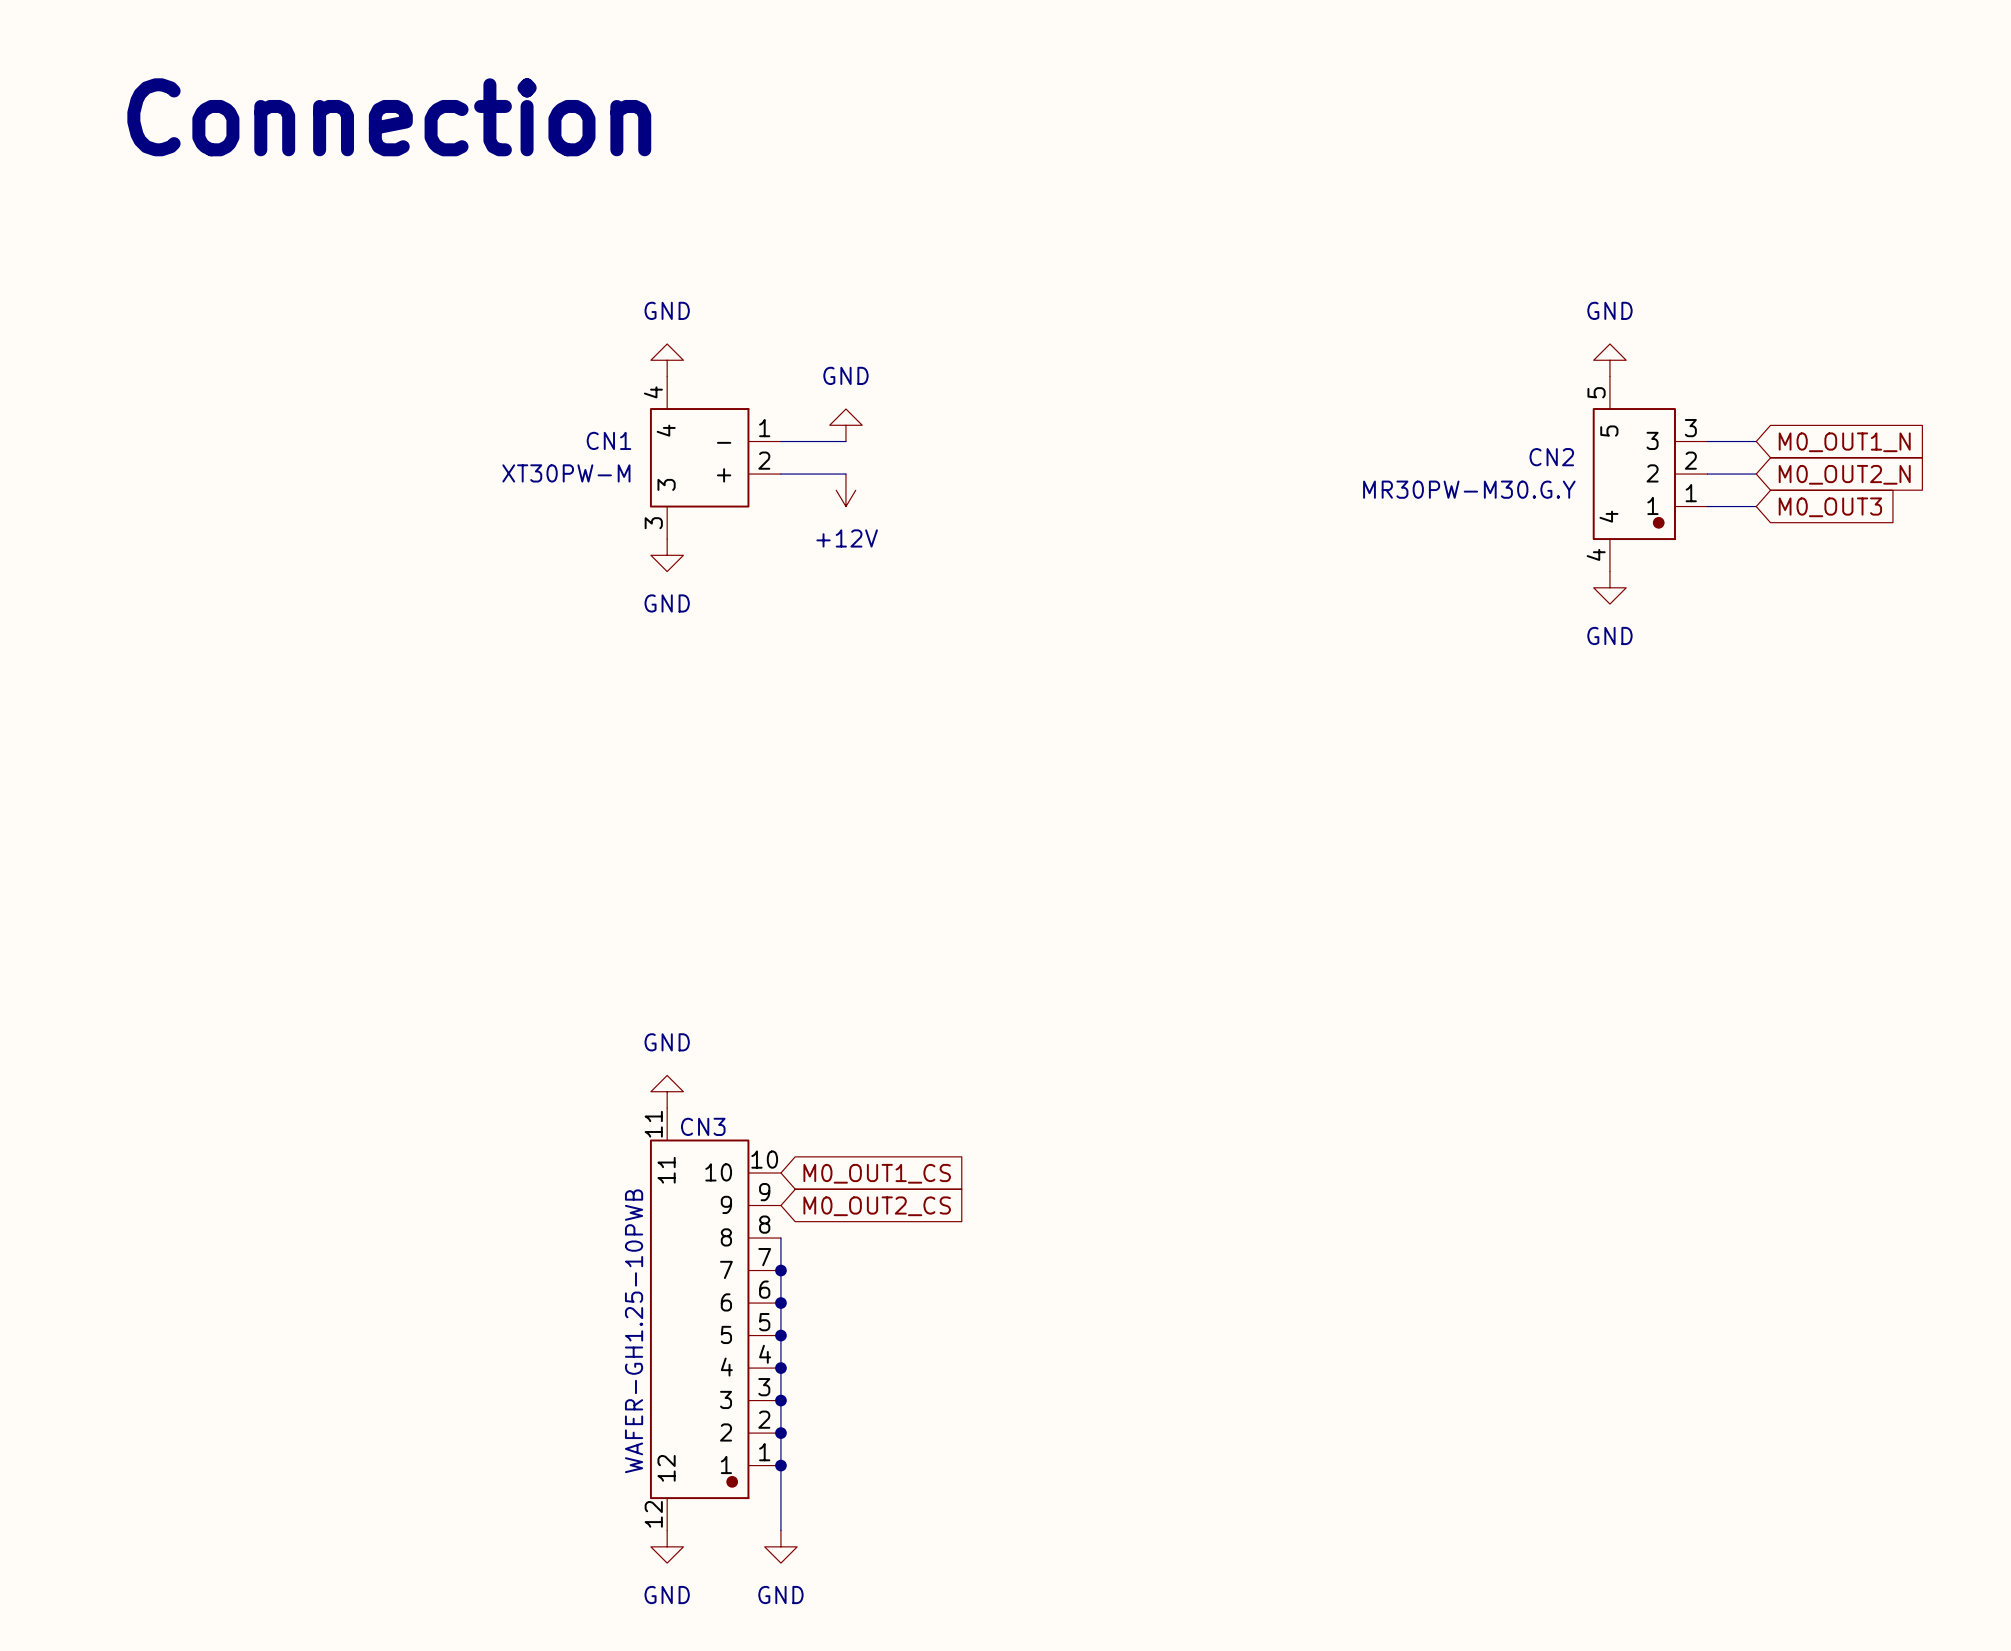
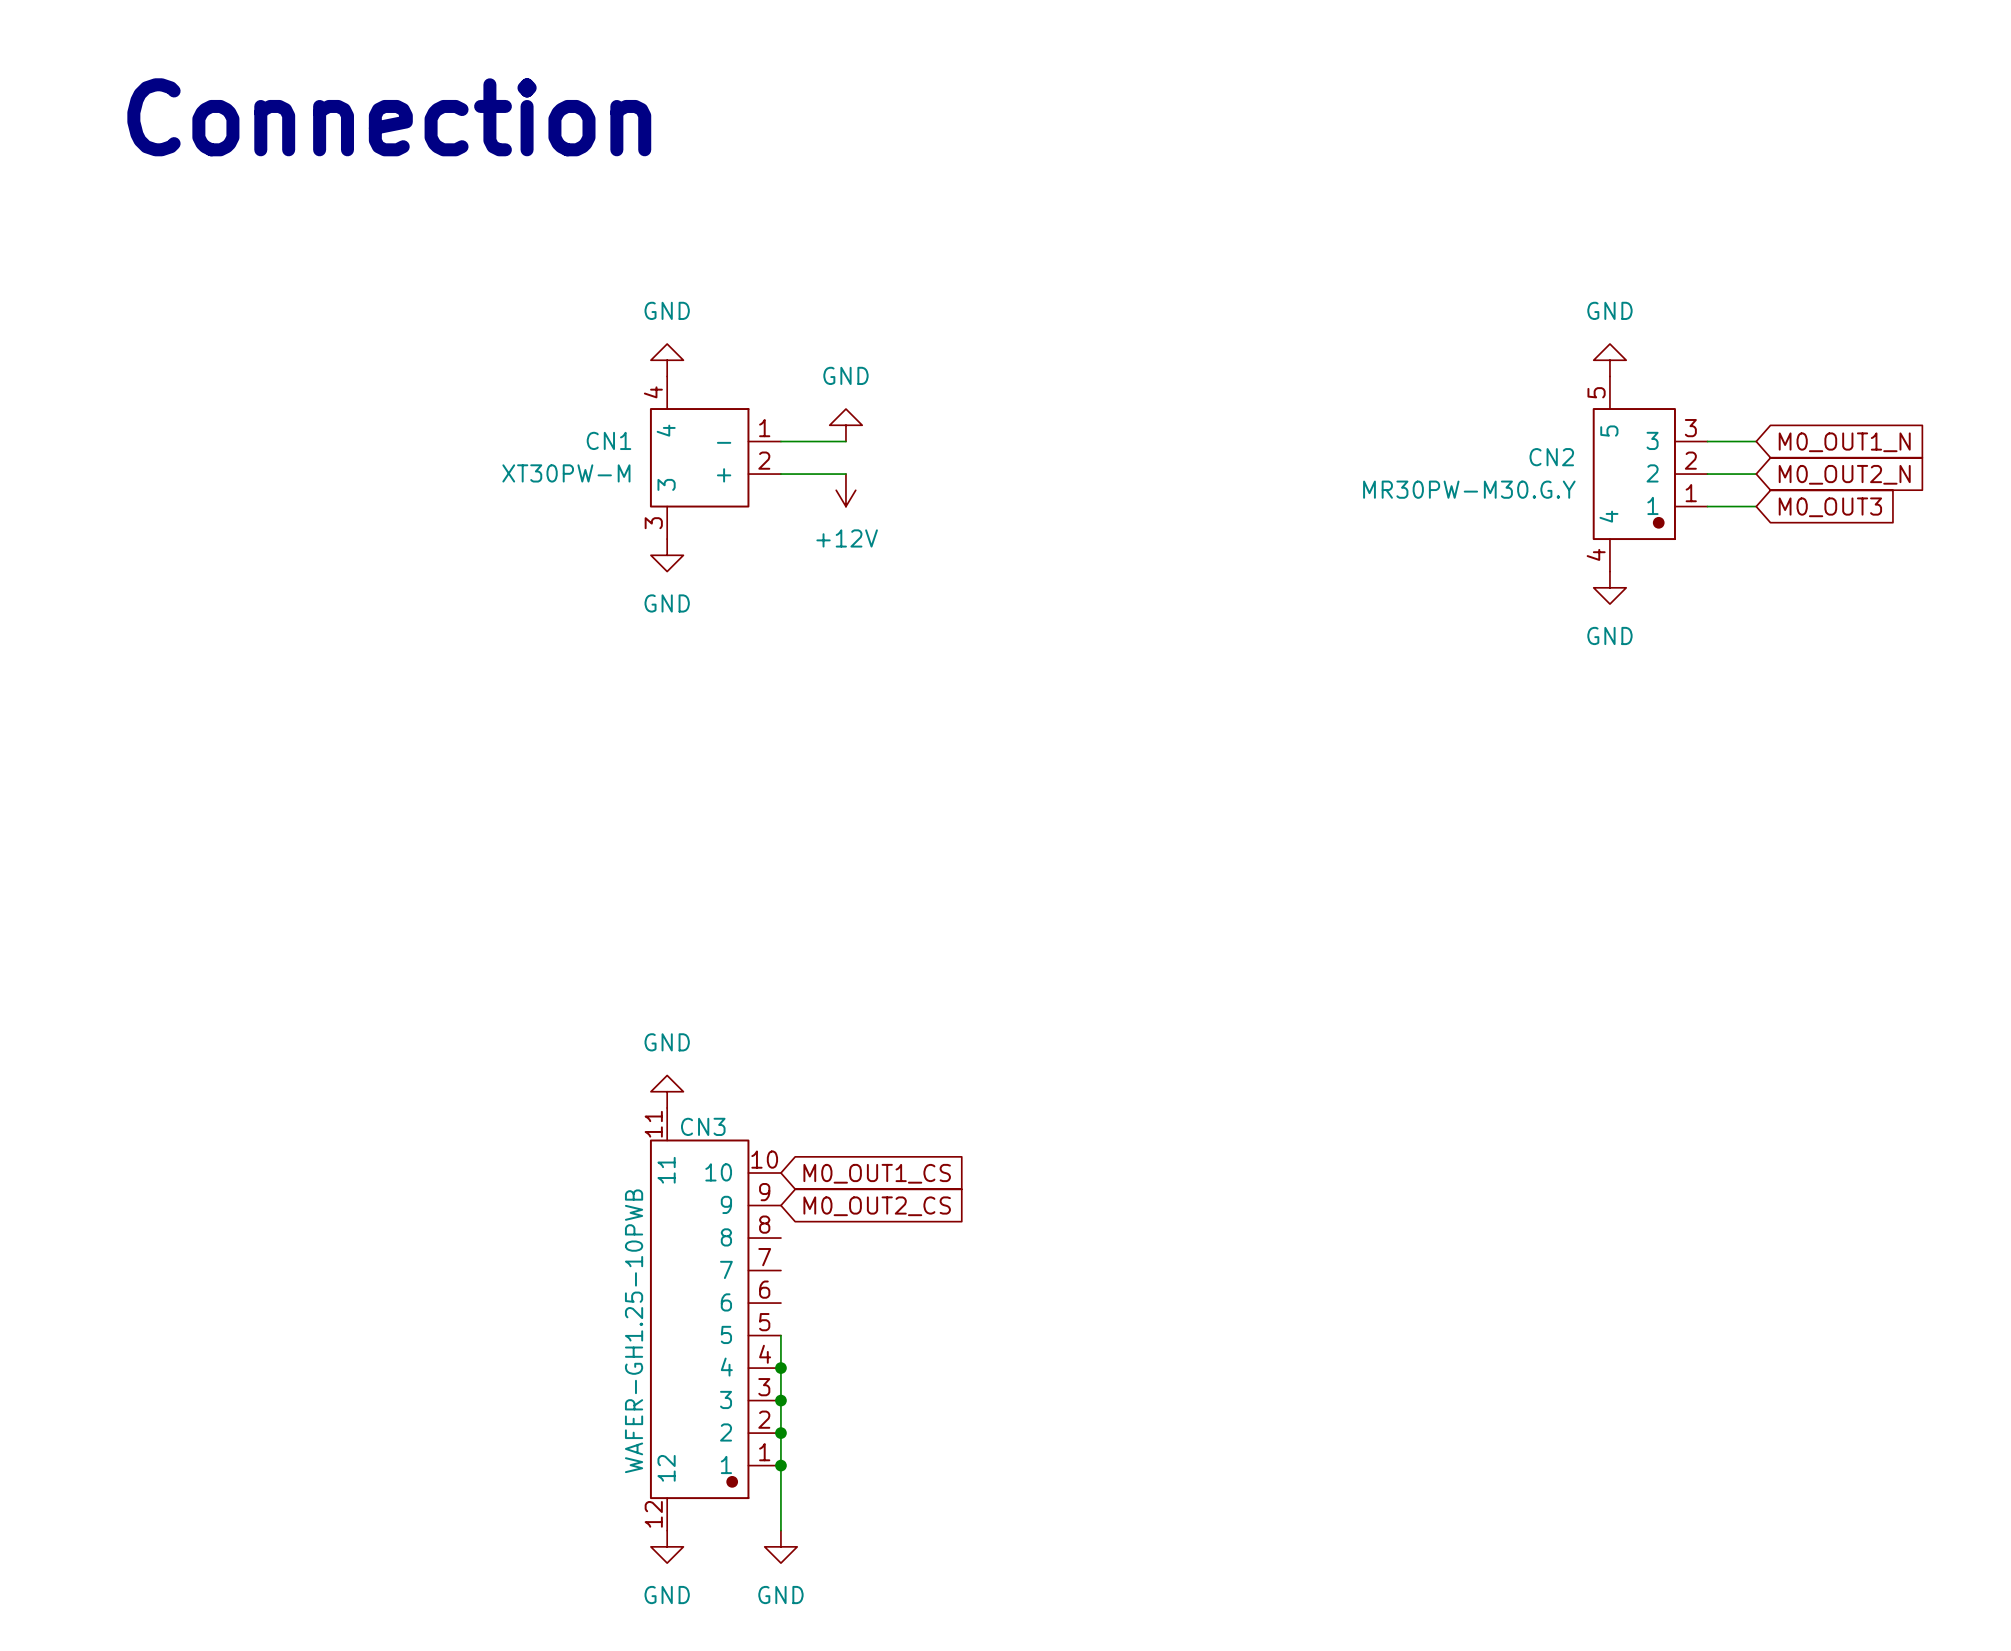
wire: (780, 1238) (780, 1335) -> none
junction: (780, 1270) -> none
junction: (780, 1303) -> none
junction: (780, 1335) -> none

